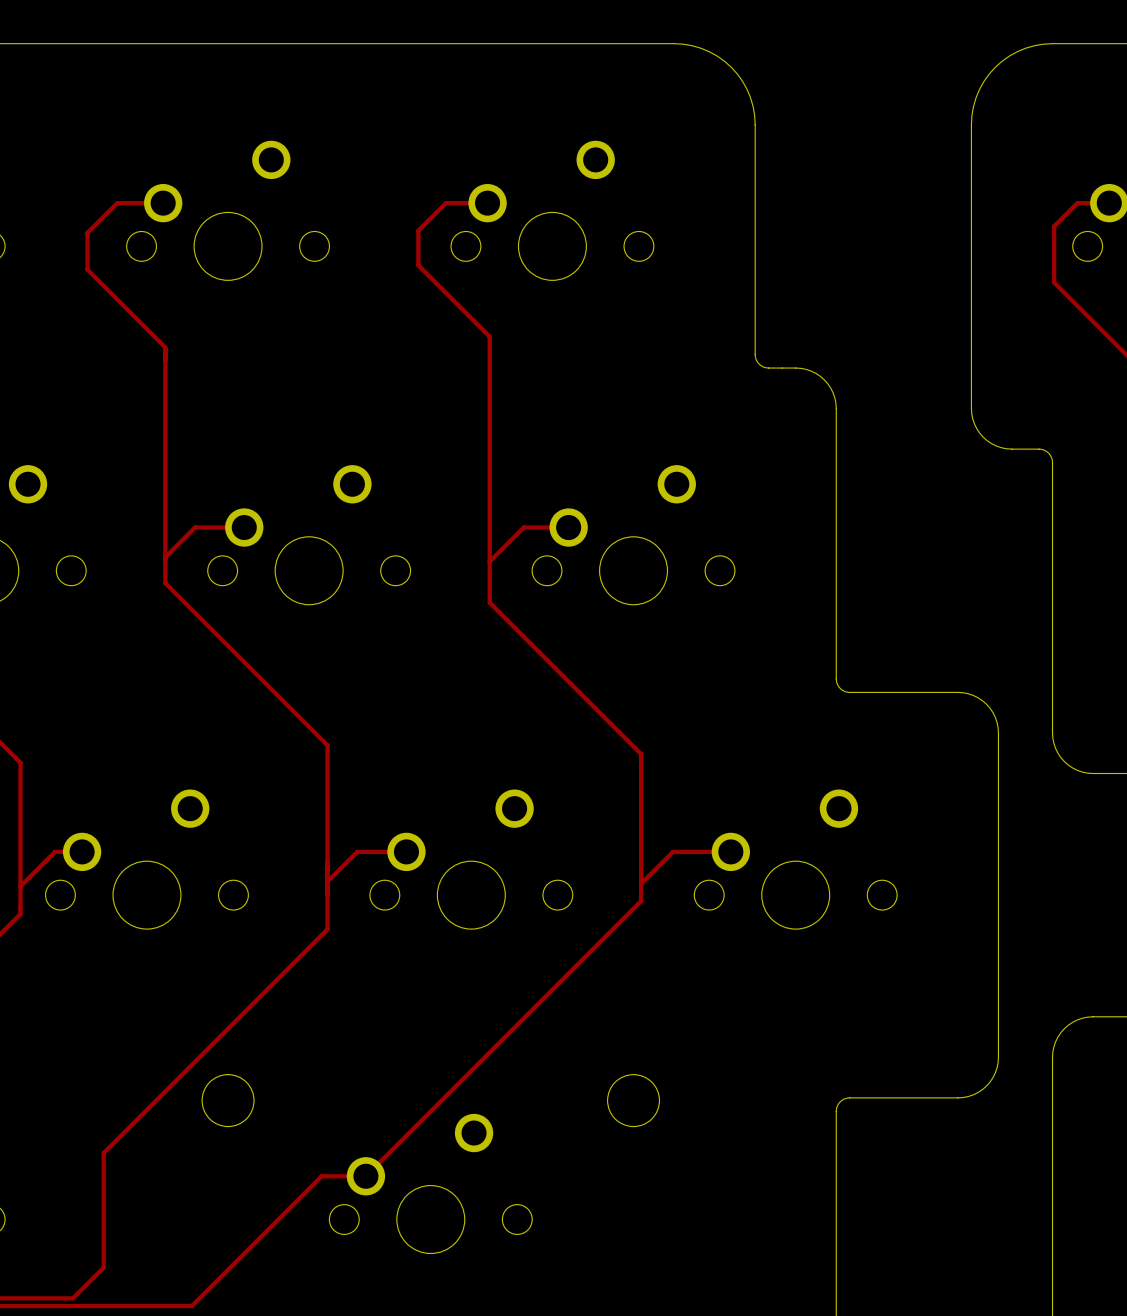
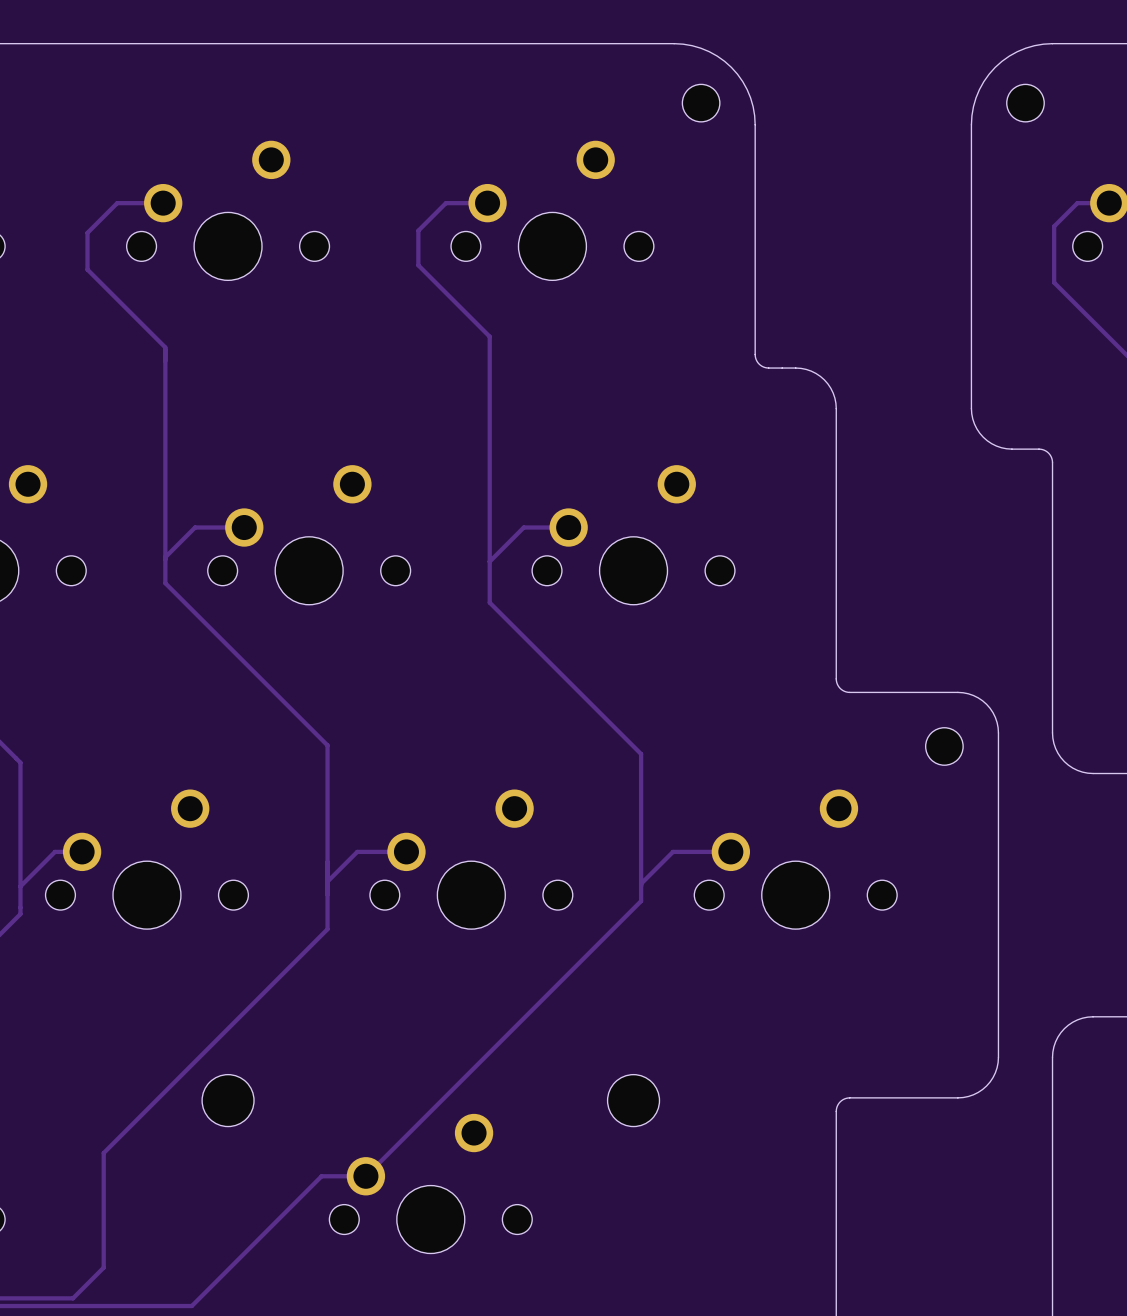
part: none -> (701, 103)
part: none -> (1025, 103)
part: none -> (944, 746)

